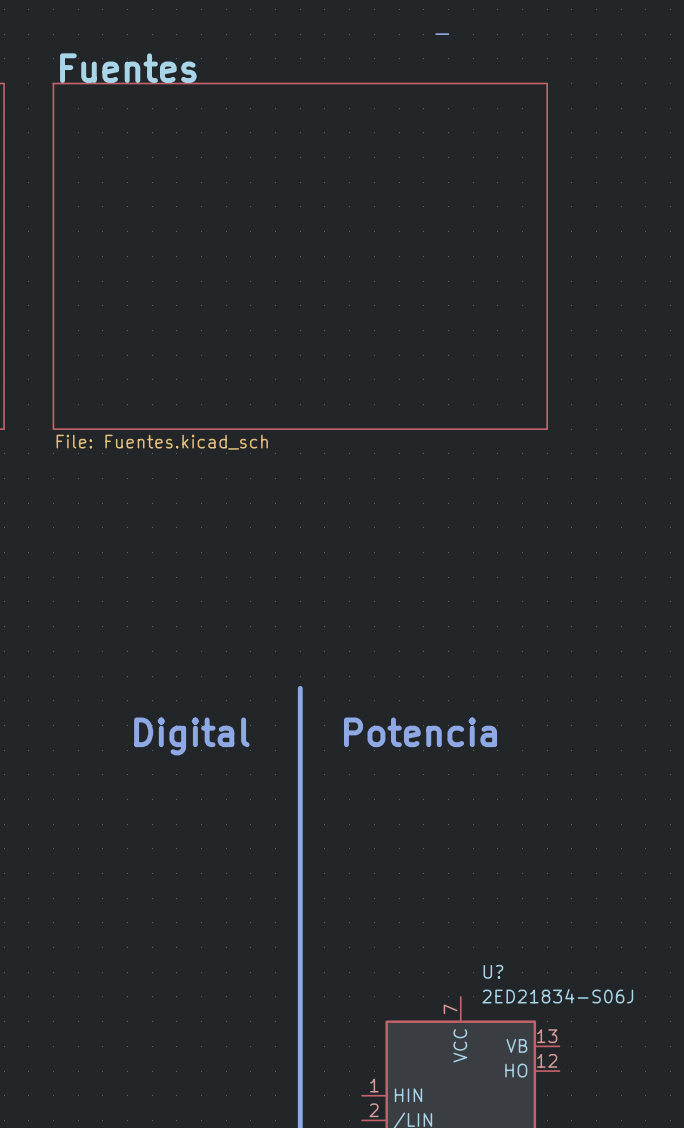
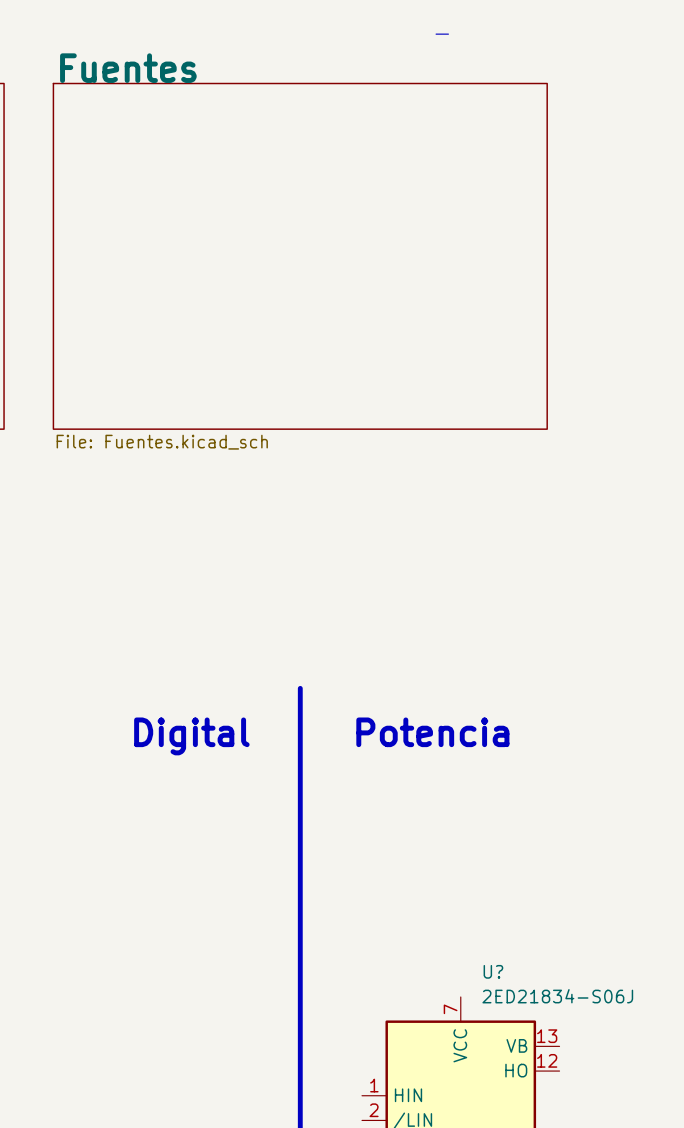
text position: Potencia (420, 732) -> Potencia (432, 732)

